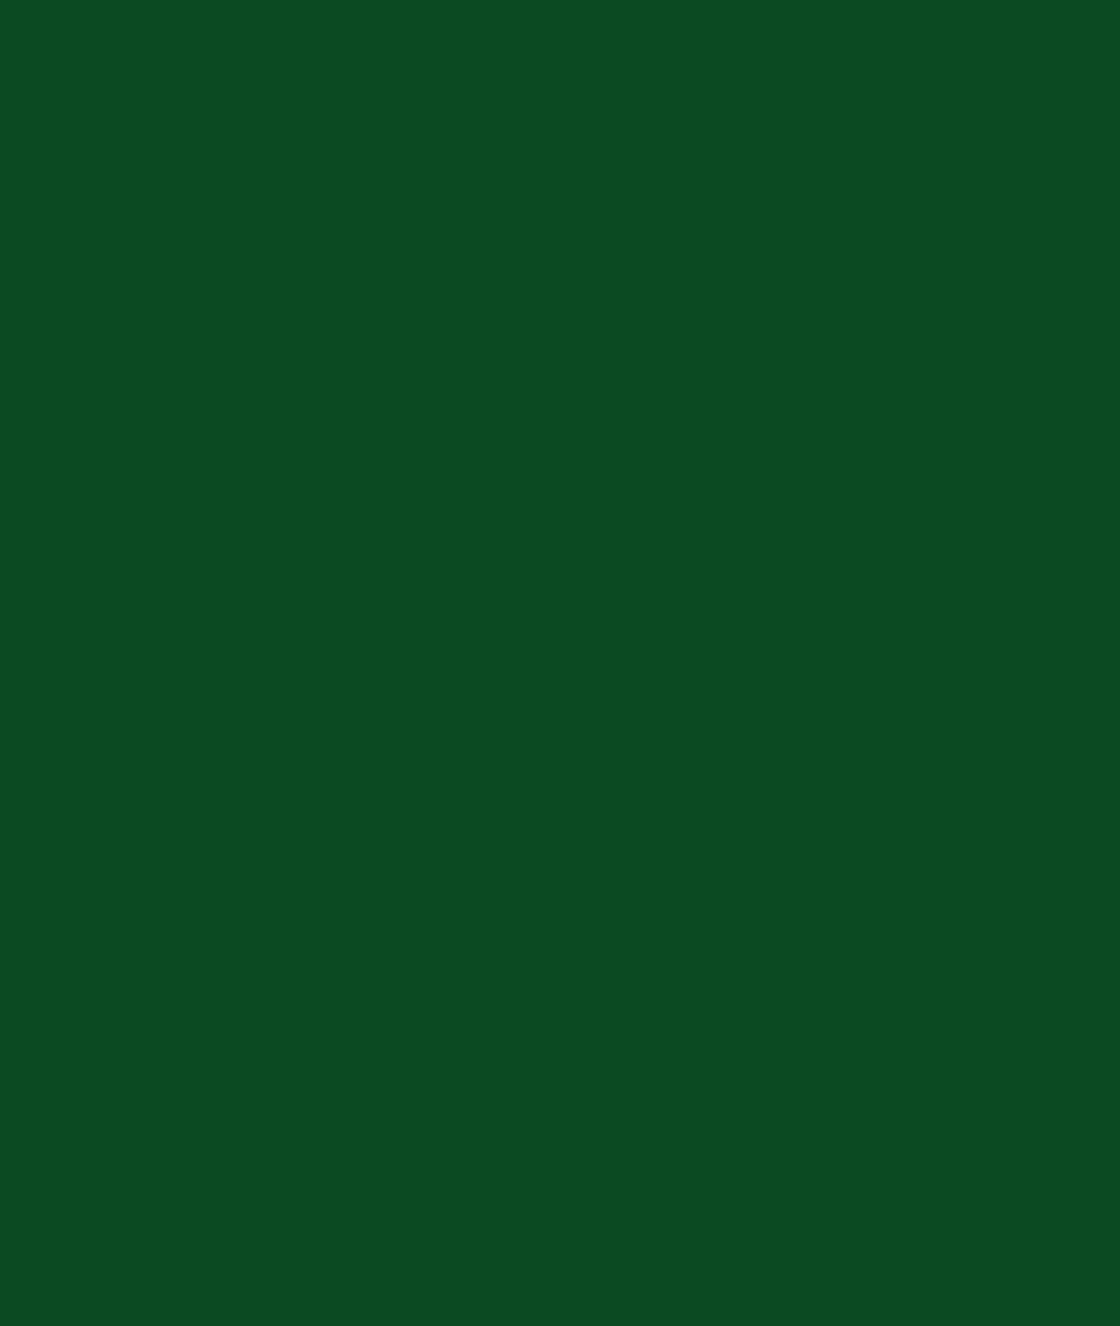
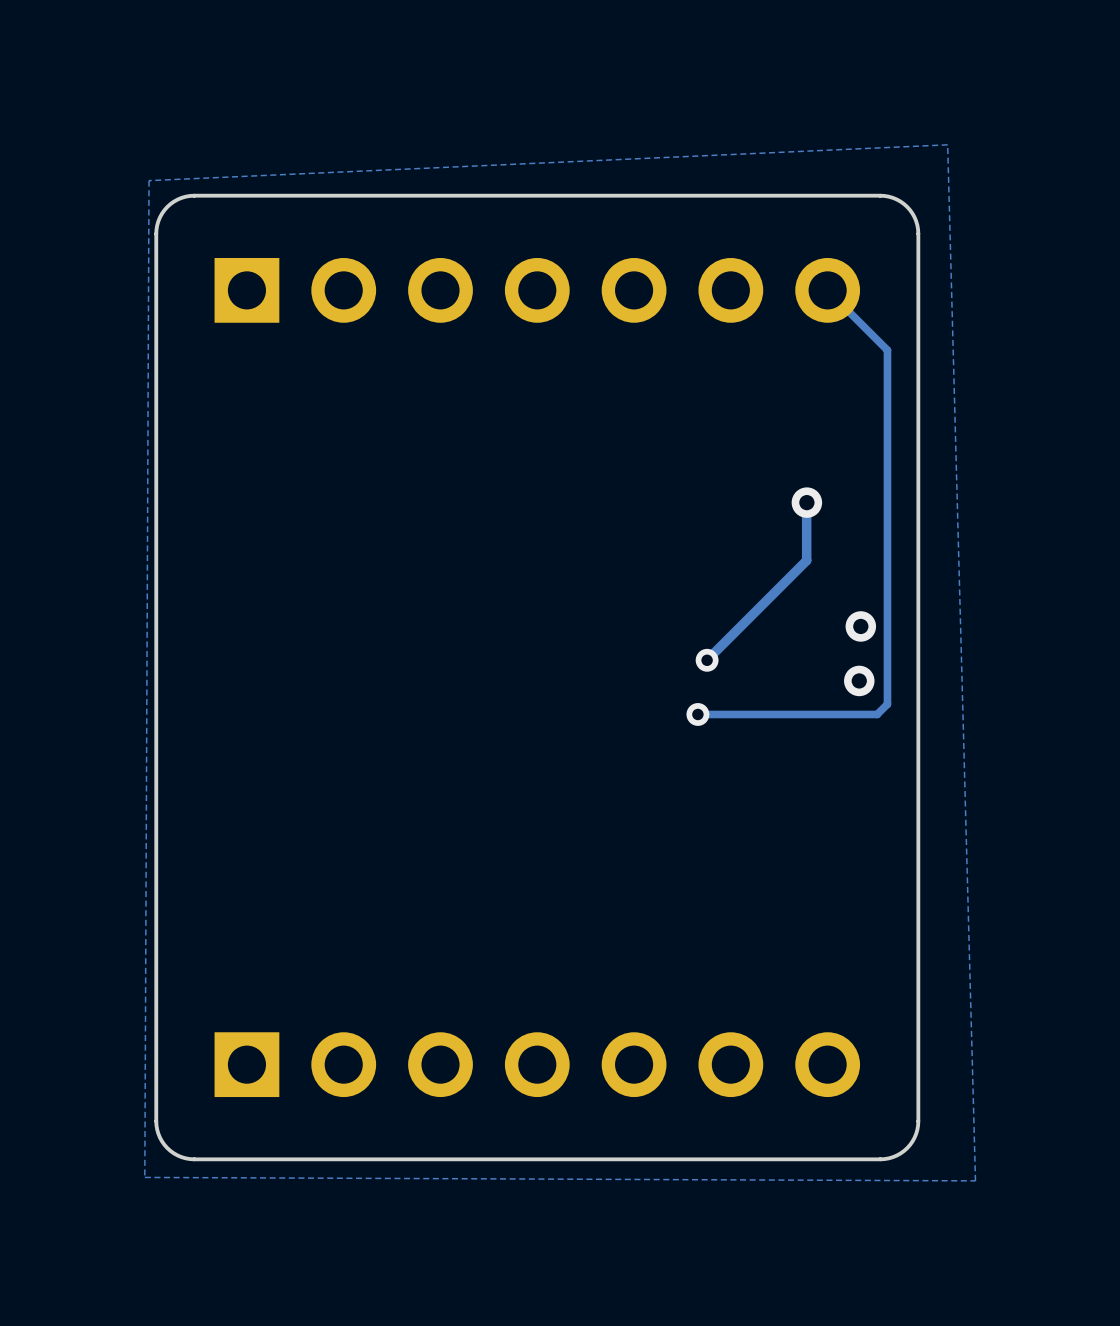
zone outline: none -> (947, 144) (975, 1180) (144, 1177) (149, 180) (947, 144)
board edge: none -> (880, 195) (194, 195) (177, 199) (164, 210) (158, 221) (156, 233) (156, 1121) (160, 1137) (170, 1151) (181, 1157) (194, 1159) (880, 1159) (896, 1155) (910, 1144) (916, 1133) (918, 1121) (918, 233) (916, 221) (907, 206) (892, 197) (880, 195)
part: none -> (537, 290)
track: none -> (827, 290) (887, 350) (887, 704) (877, 714) (697, 714)
track: none -> (806, 502) (806, 560) (707, 660)
via: none -> (806, 502)
via: none -> (860, 626)
via: none -> (707, 660)
via: none -> (859, 680)
via: none -> (697, 714)
part: none -> (537, 1064)

